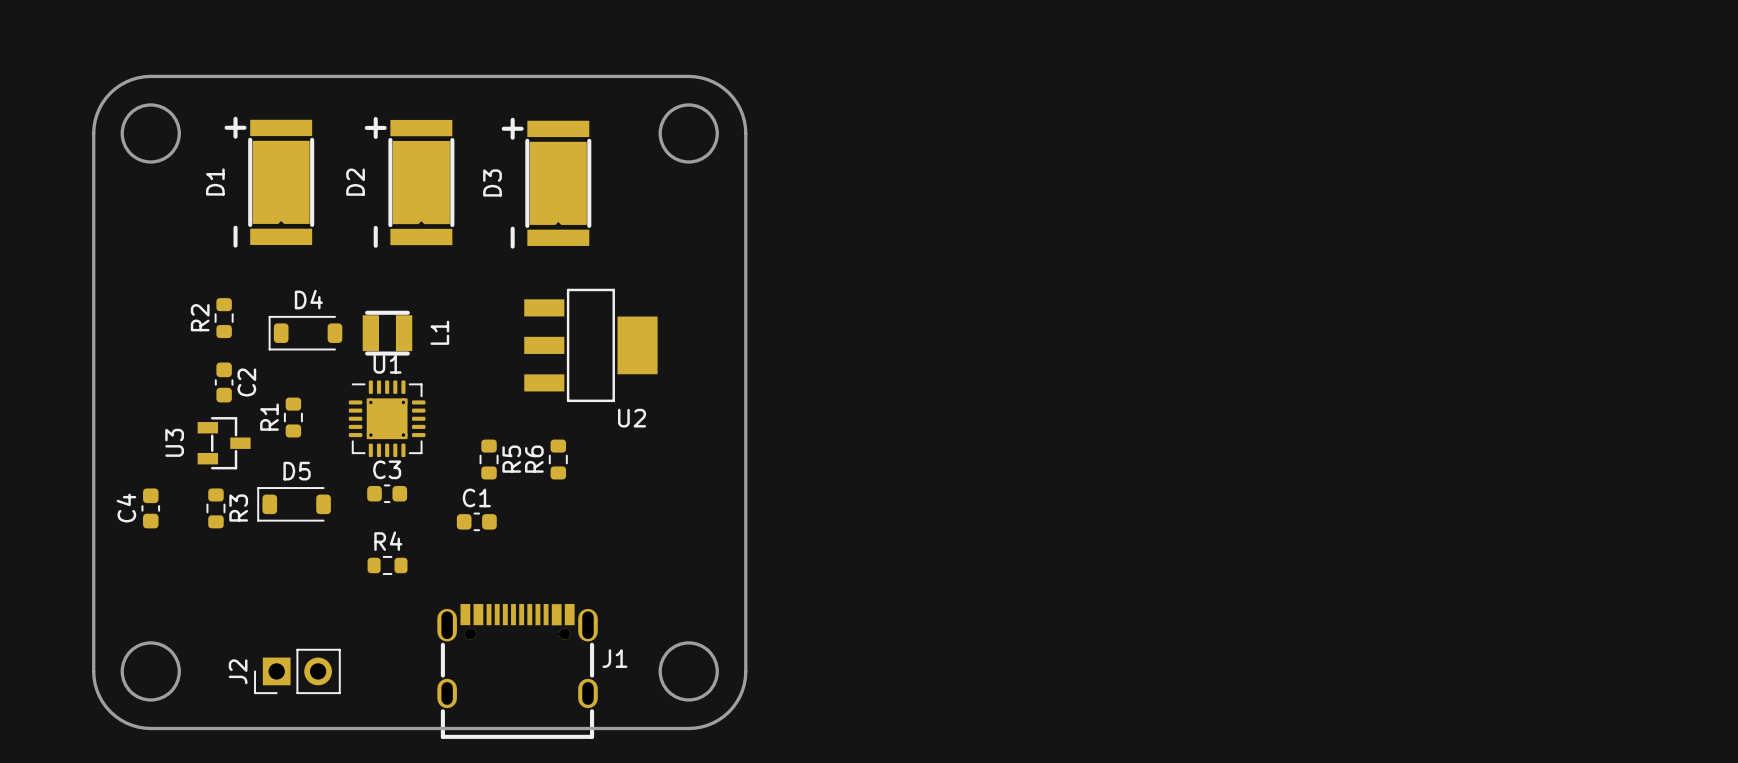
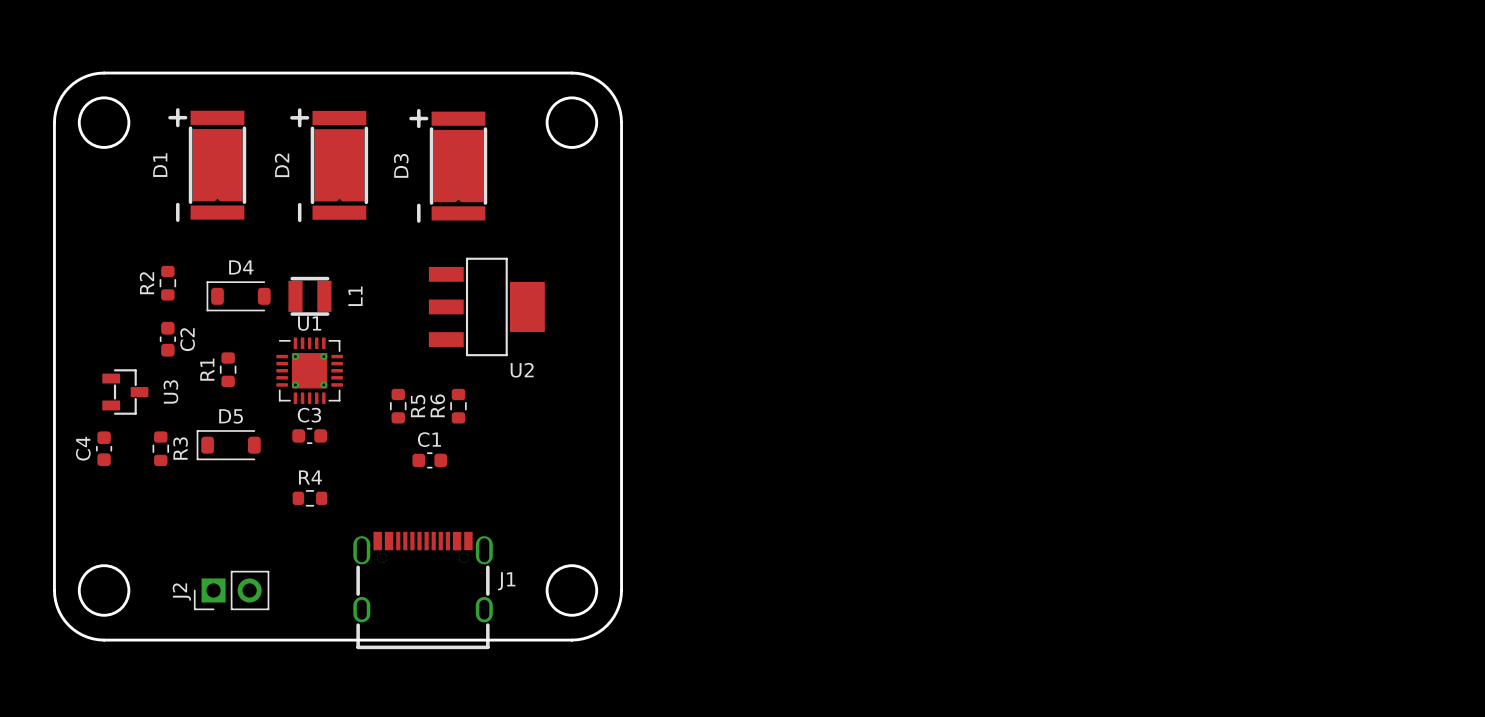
U3 name position: U3 (174, 442) -> U3 (170, 391)
U3 position: (224, 443) -> (125, 392)
C1 position: (476, 521) -> (429, 460)

